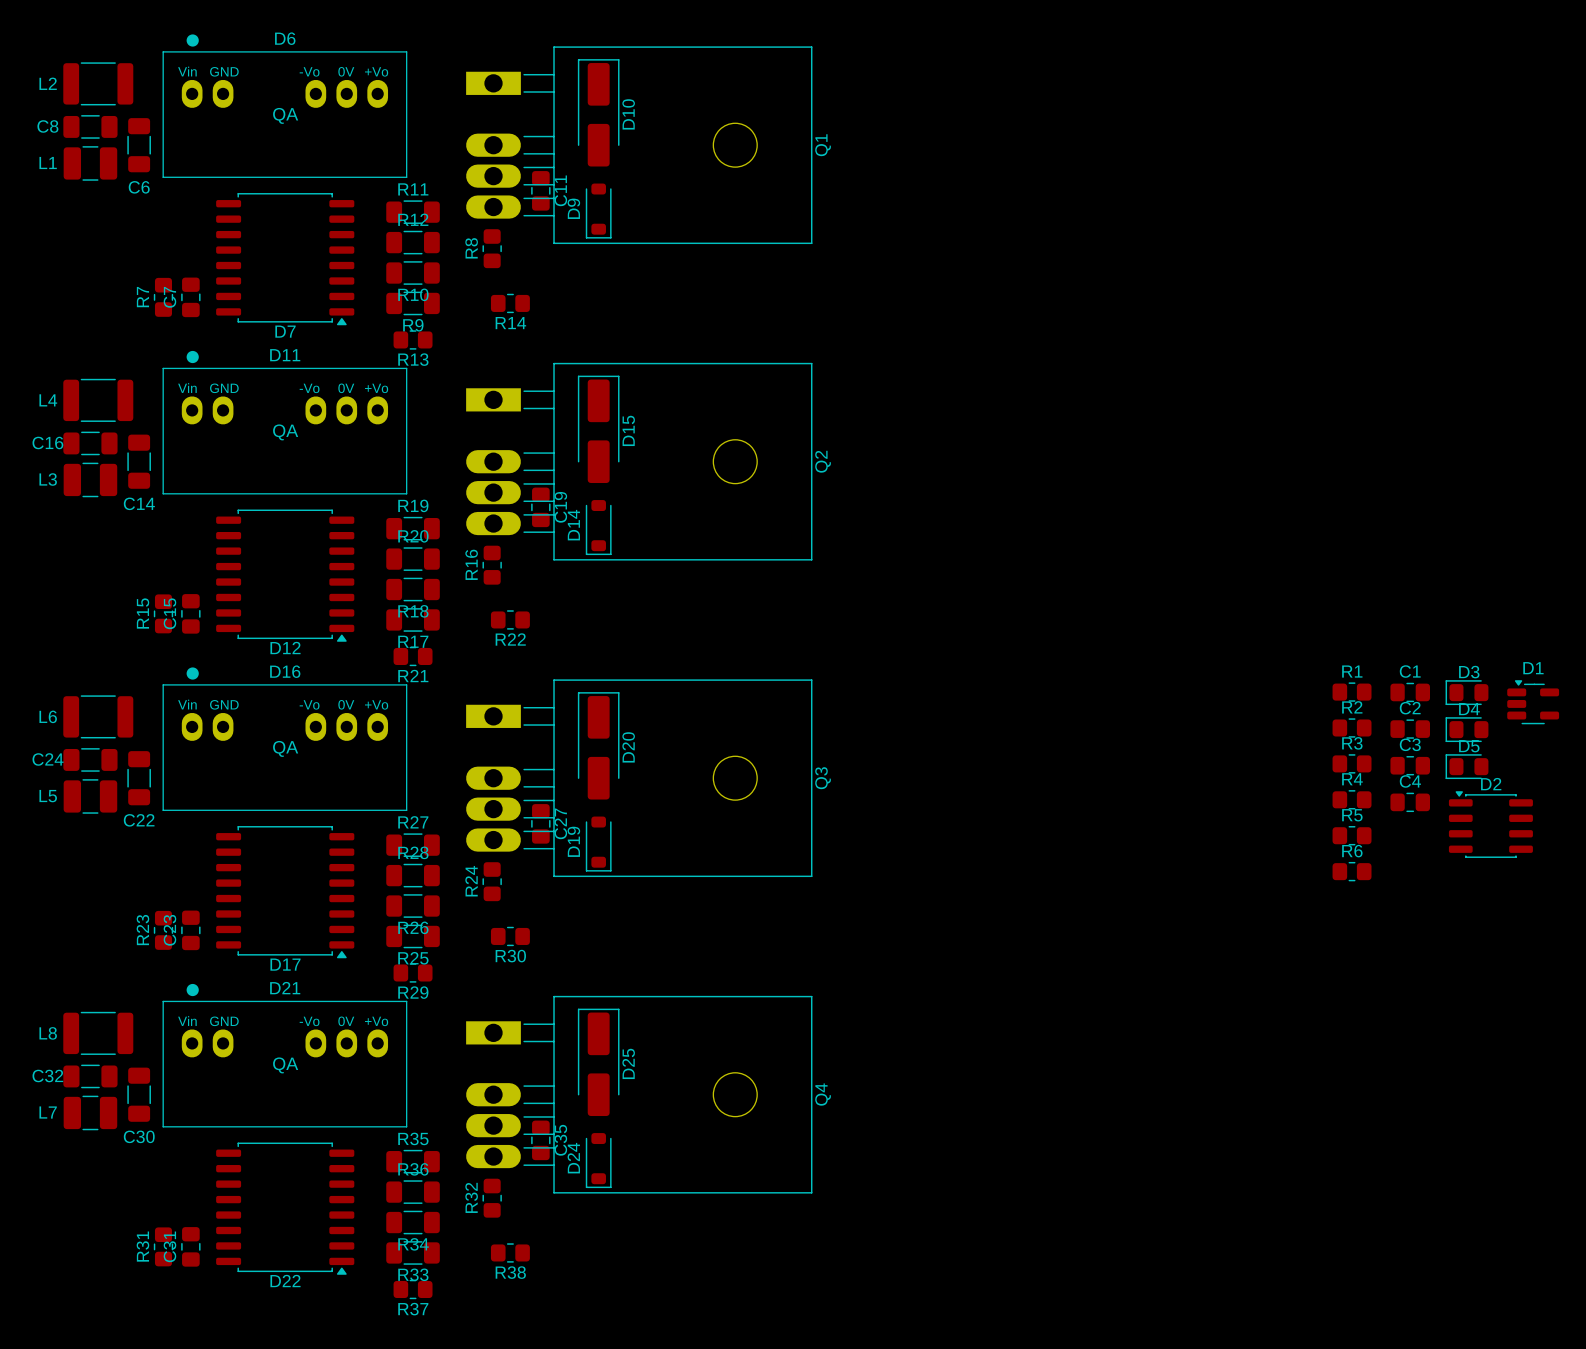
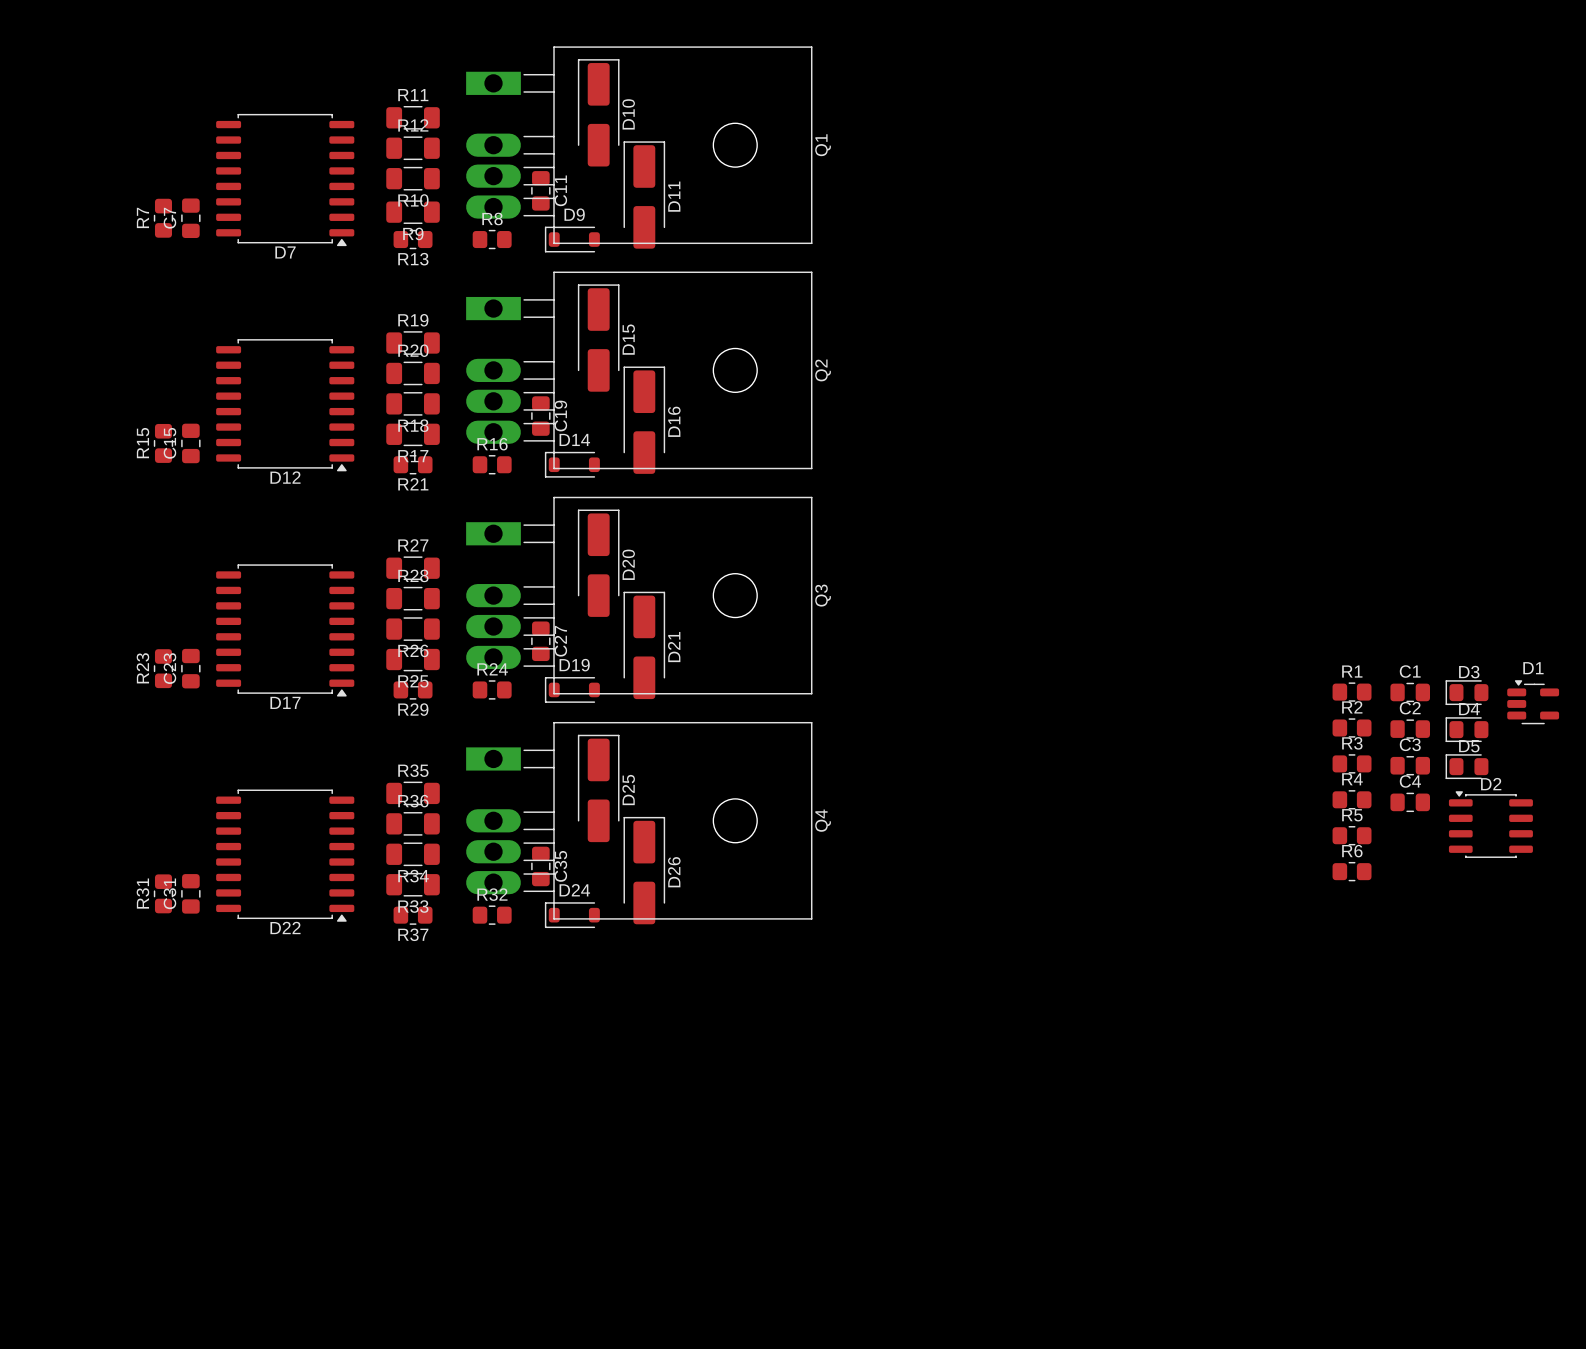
L2: (98, 83) -> none
D6: (284, 106) -> none
R11: none -> (413, 117)
C8: (90, 126) -> none
C6: (139, 145) -> none
L1: (90, 163) -> none
R11 name: R11 (413, 189) -> R9 (413, 233)
D9 rotation: 0° (598, 211) -> 90° clockwise (572, 239)
D9 position: (598, 211) -> (572, 239)
R12 position: (413, 242) -> (413, 148)
R8 rotation: 0° (492, 248) -> 90° clockwise (492, 239)
D7 position: (285, 259) -> (285, 180)
R10 position: (413, 273) -> (413, 178)
R7 position: (163, 297) -> (163, 218)
C7 position: (190, 297) -> (190, 218)
R9: (413, 303) -> none
R14: (510, 303) -> none
R13 position: (413, 339) -> (413, 239)
D11 footprint: [162, 350, 408, 495] -> [623, 141, 666, 249]
D11 name position: D11 (285, 355) -> D11 (674, 196)
L4: (98, 400) -> none
D15 position: (598, 429) -> (598, 338)
C16: (90, 443) -> none
C14: (139, 461) -> none
Q2 position: (639, 461) -> (639, 370)
L3: (90, 479) -> none
C19 position: (540, 507) -> (540, 416)
D14 rotation: 0° (598, 527) -> 90° clockwise (572, 464)
D14 position: (598, 527) -> (572, 464)
R19 position: (413, 528) -> (413, 343)
R20 position: (413, 559) -> (413, 373)
R16 rotation: 0° (492, 565) -> 90° clockwise (492, 464)
R16 position: (492, 565) -> (492, 464)
D12 position: (285, 575) -> (285, 405)
R18 position: (413, 589) -> (413, 403)
R15 position: (163, 613) -> (163, 443)
C15 position: (190, 613) -> (190, 443)
R17 position: (413, 619) -> (413, 434)
R22: (510, 619) -> none
R21 position: (413, 656) -> (413, 464)
D16 footprint: [162, 667, 408, 811] -> [623, 366, 666, 474]
D16 name position: D16 (285, 671) -> D16 (674, 421)
L6: (98, 716) -> none
D20 position: (598, 745) -> (598, 563)
C24: (90, 759) -> none
C22: (139, 778) -> none
Q3 position: (639, 778) -> (639, 595)
L5: (90, 796) -> none
C27 position: (540, 823) -> (540, 641)
D19 rotation: 0° (598, 844) -> 90° clockwise (572, 689)
D19 position: (598, 844) -> (572, 689)
R27 position: (413, 845) -> (413, 568)
D26: none -> (644, 870)
R28 position: (413, 875) -> (413, 598)
R24 rotation: 0° (492, 881) -> 90° clockwise (492, 689)
R24 position: (492, 881) -> (492, 689)
D17 position: (285, 892) -> (285, 630)
R26 position: (413, 906) -> (413, 629)
R23 position: (163, 930) -> (163, 668)
C23 position: (190, 930) -> (190, 668)
R25 position: (413, 936) -> (413, 659)
R30: (510, 936) -> none
R29 position: (413, 972) -> (413, 689)
D21 footprint: [162, 983, 408, 1128] -> [623, 591, 666, 700]
D21 name position: D21 (285, 988) -> D21 (674, 647)
L8: (98, 1033) -> none
D25 position: (598, 1062) -> (598, 788)
C32: (90, 1076) -> none
C30: (139, 1094) -> none
Q4 position: (639, 1094) -> (639, 820)
L7: (90, 1112) -> none
C35 position: (540, 1140) -> (540, 866)
D24 rotation: 0° (598, 1160) -> 90° clockwise (572, 915)
D24 position: (598, 1160) -> (572, 915)
R35 position: (413, 1161) -> (413, 793)
R36 position: (413, 1192) -> (413, 823)
R32 rotation: 0° (492, 1198) -> 90° clockwise (492, 915)
R32 position: (492, 1198) -> (492, 915)
D22 position: (285, 1208) -> (285, 855)
R34 position: (413, 1222) -> (413, 854)
R31 position: (163, 1246) -> (163, 893)
C31 position: (190, 1246) -> (190, 893)
R33 position: (413, 1252) -> (413, 884)
R38: (510, 1252) -> none
R37 position: (413, 1289) -> (413, 915)

